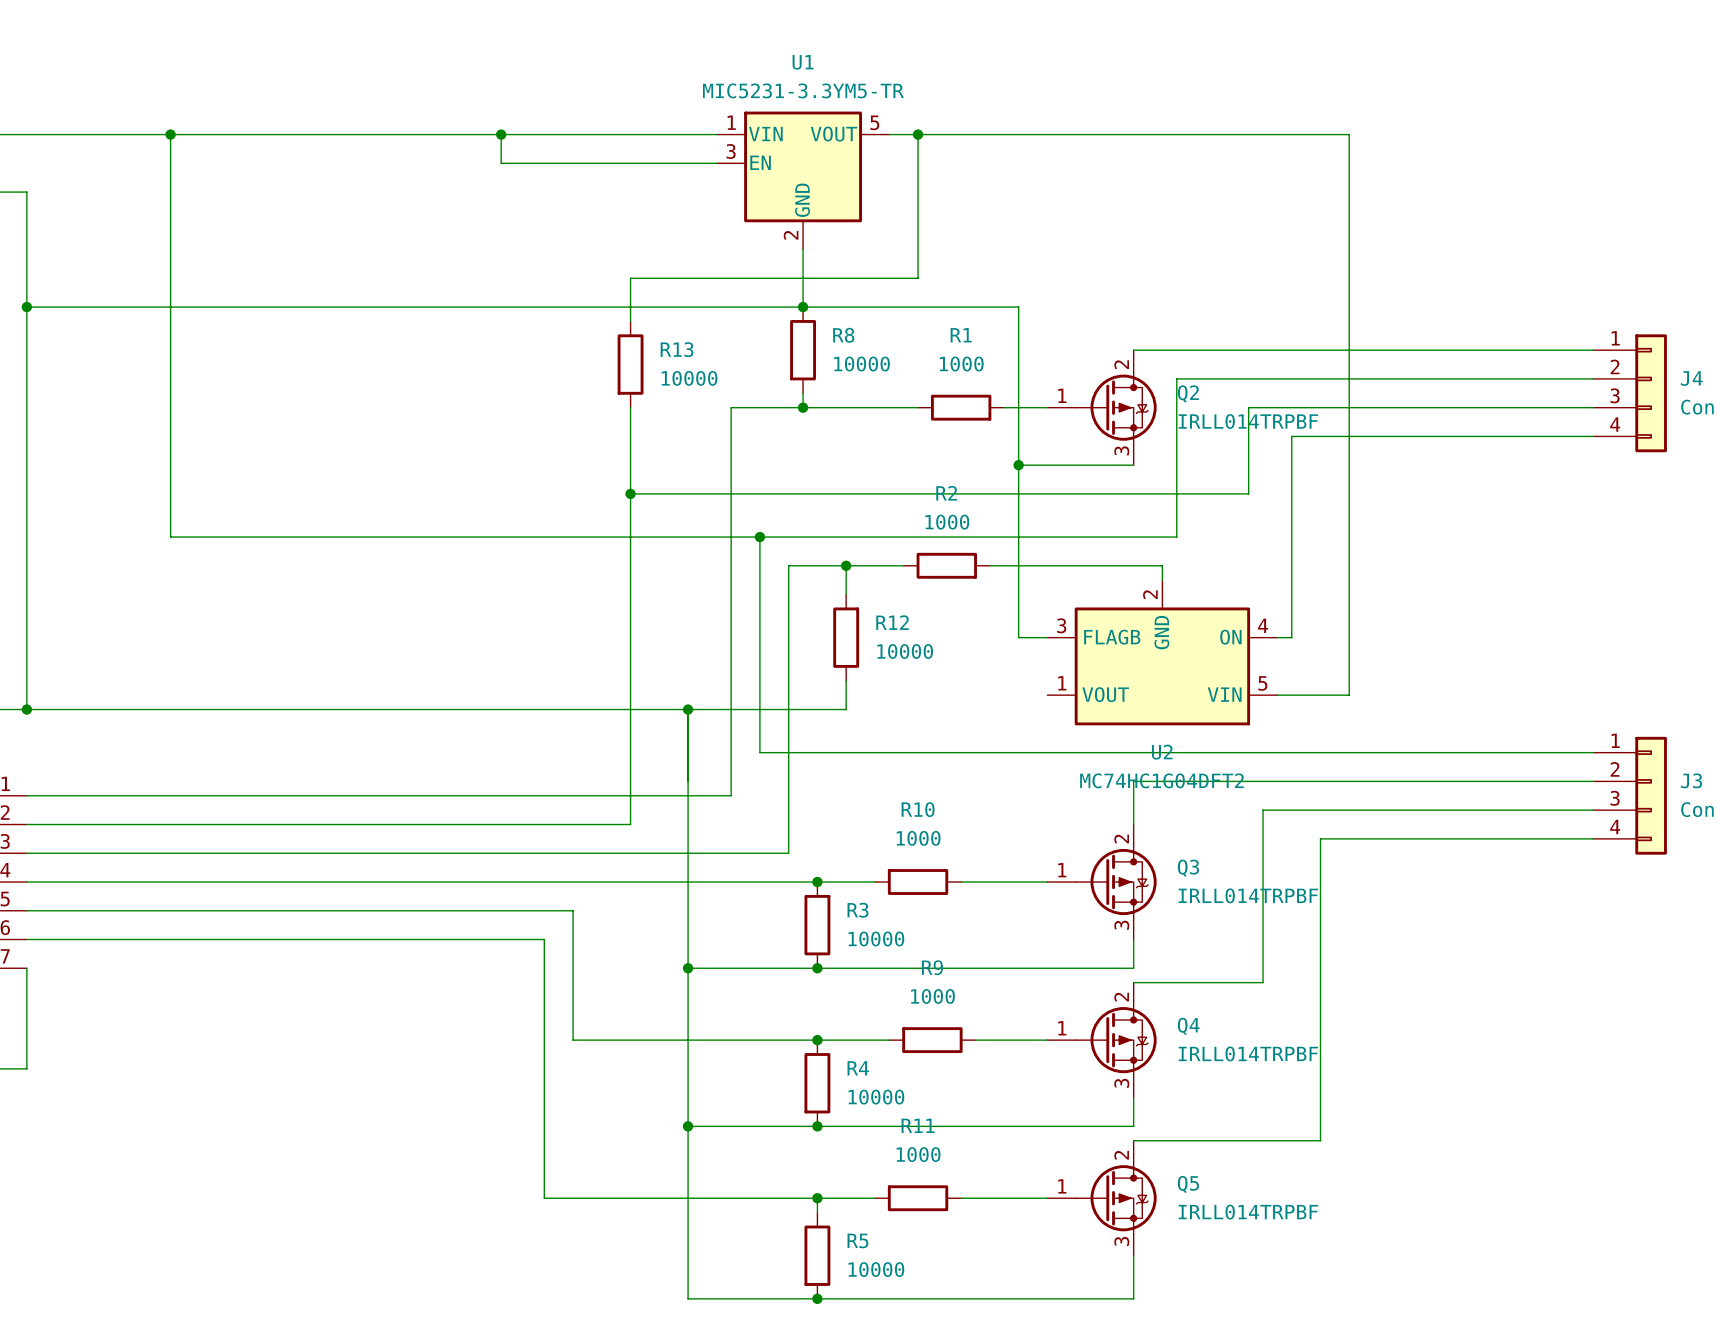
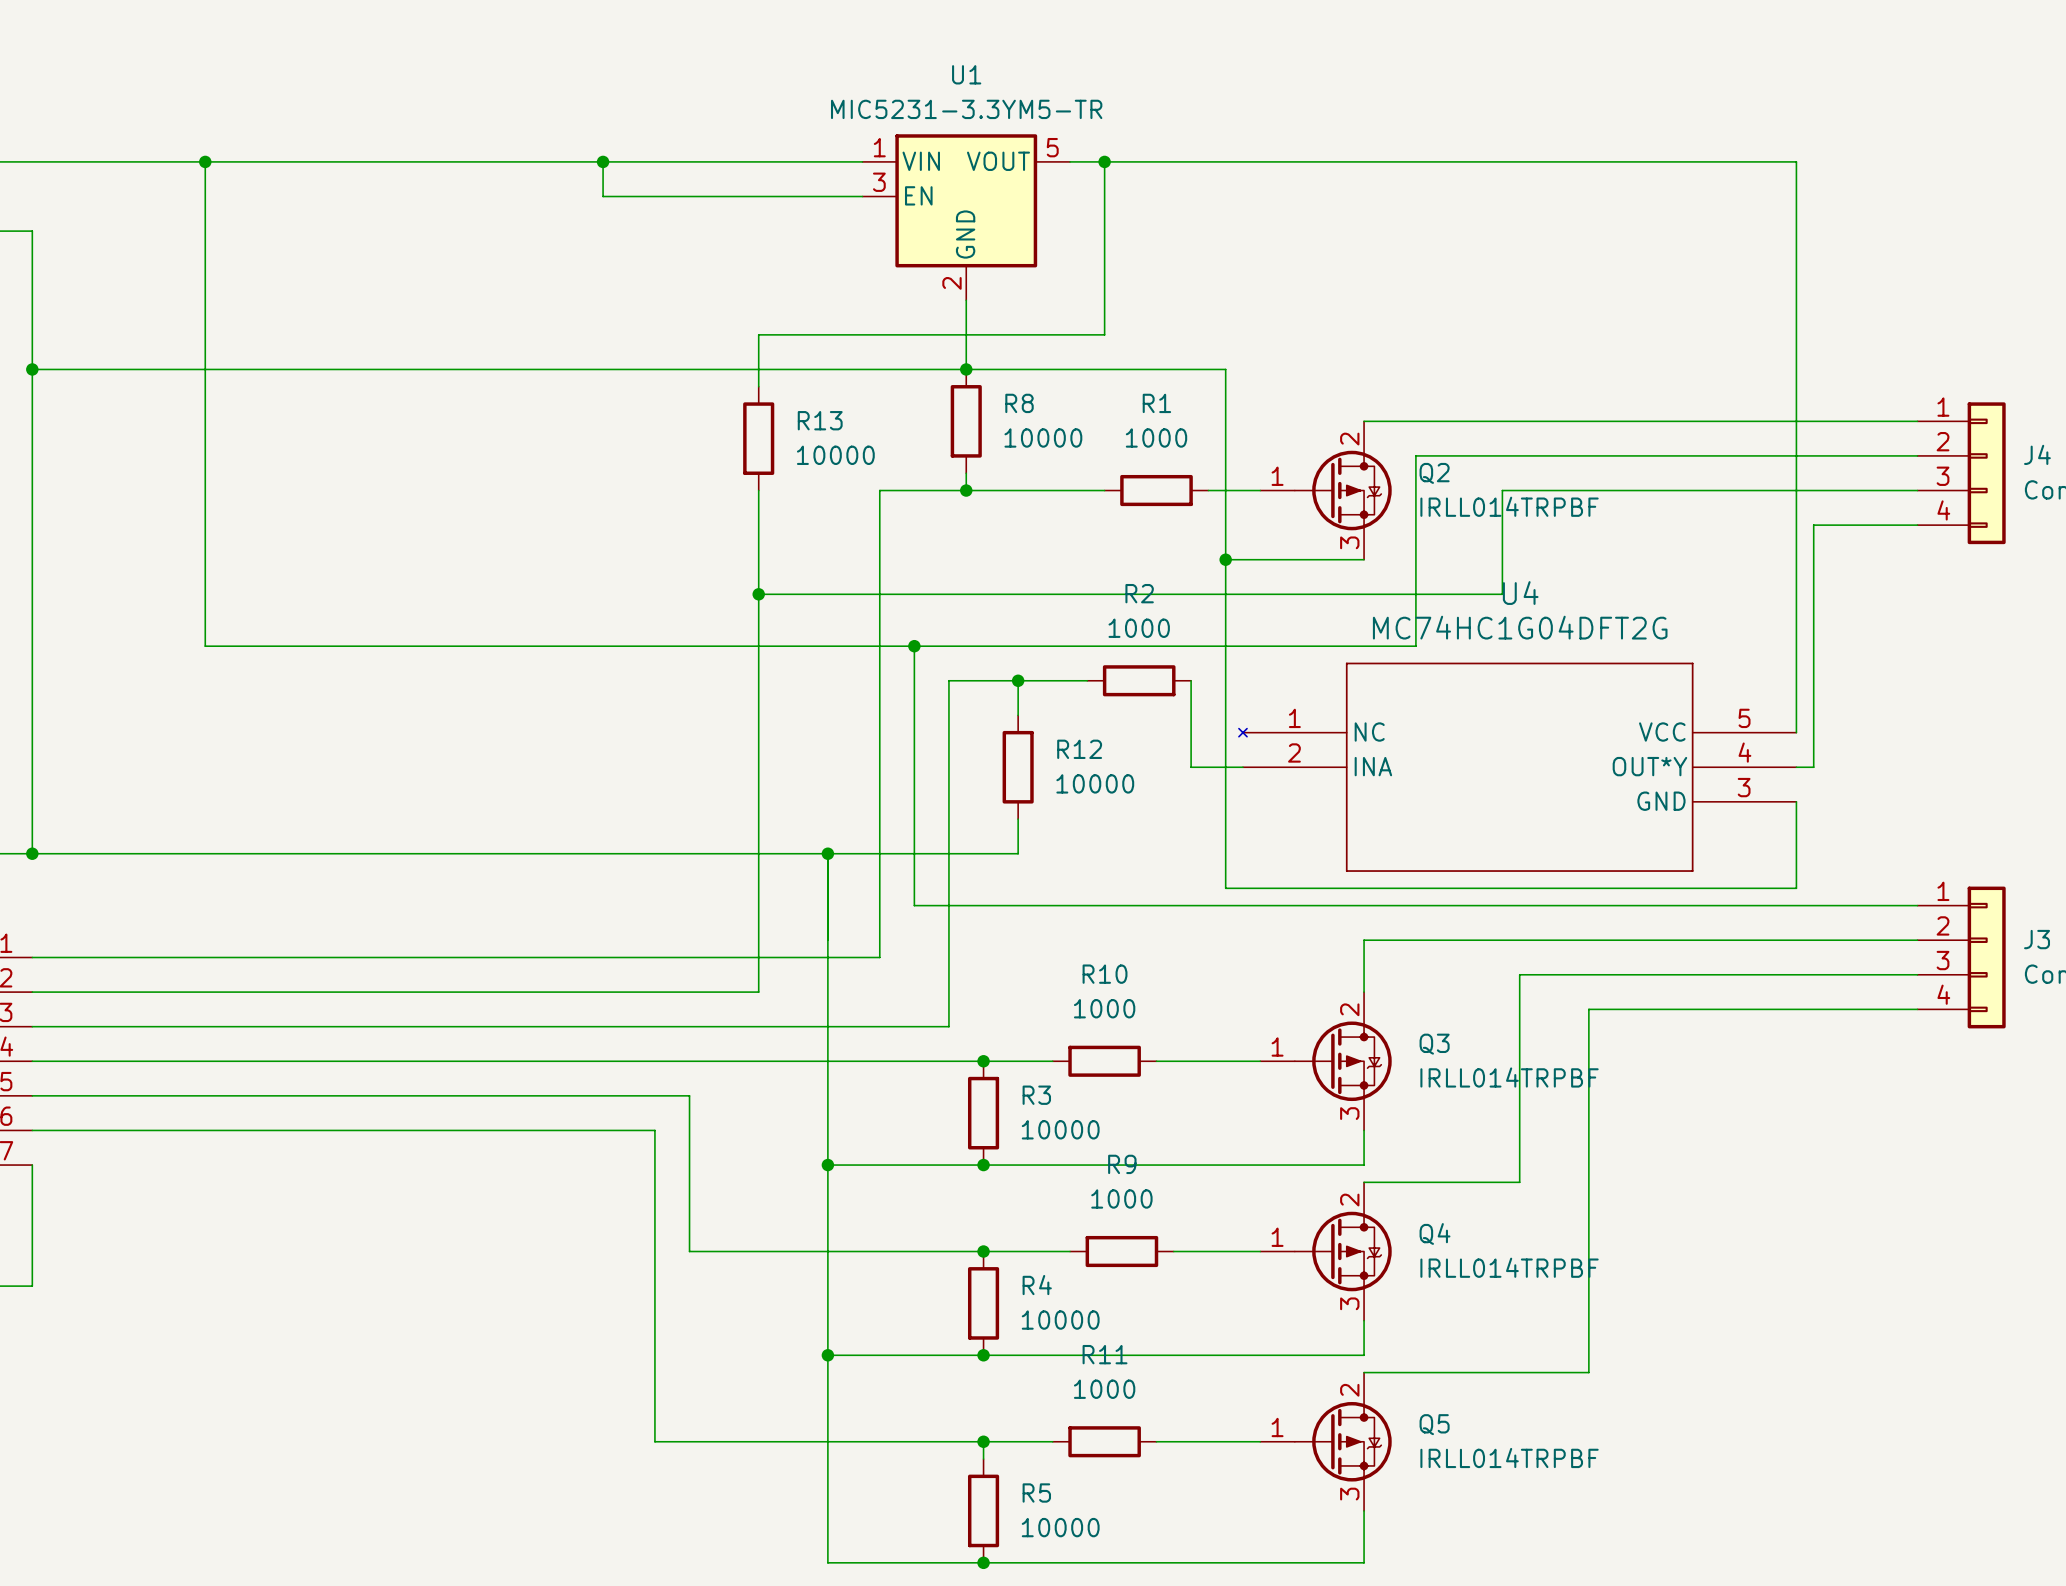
wire: (1349, 134) (1349, 695) (1277, 695) -> (1623, 161) (1796, 161) (1796, 732)
wire: (1507, 436) (1291, 436) (1291, 637) (1277, 637) -> (1813, 525) (1813, 767) (1796, 767)
wire: (989, 565) (1162, 565) (1162, 580) -> (1191, 680) (1191, 767) (1225, 767) (1225, 888) (1796, 888) (1796, 801)
U4: none -> MC74HC1G04DFT2G (1517, 767)
U2: MC74HC1G04DFT2 (1162, 652) -> none

